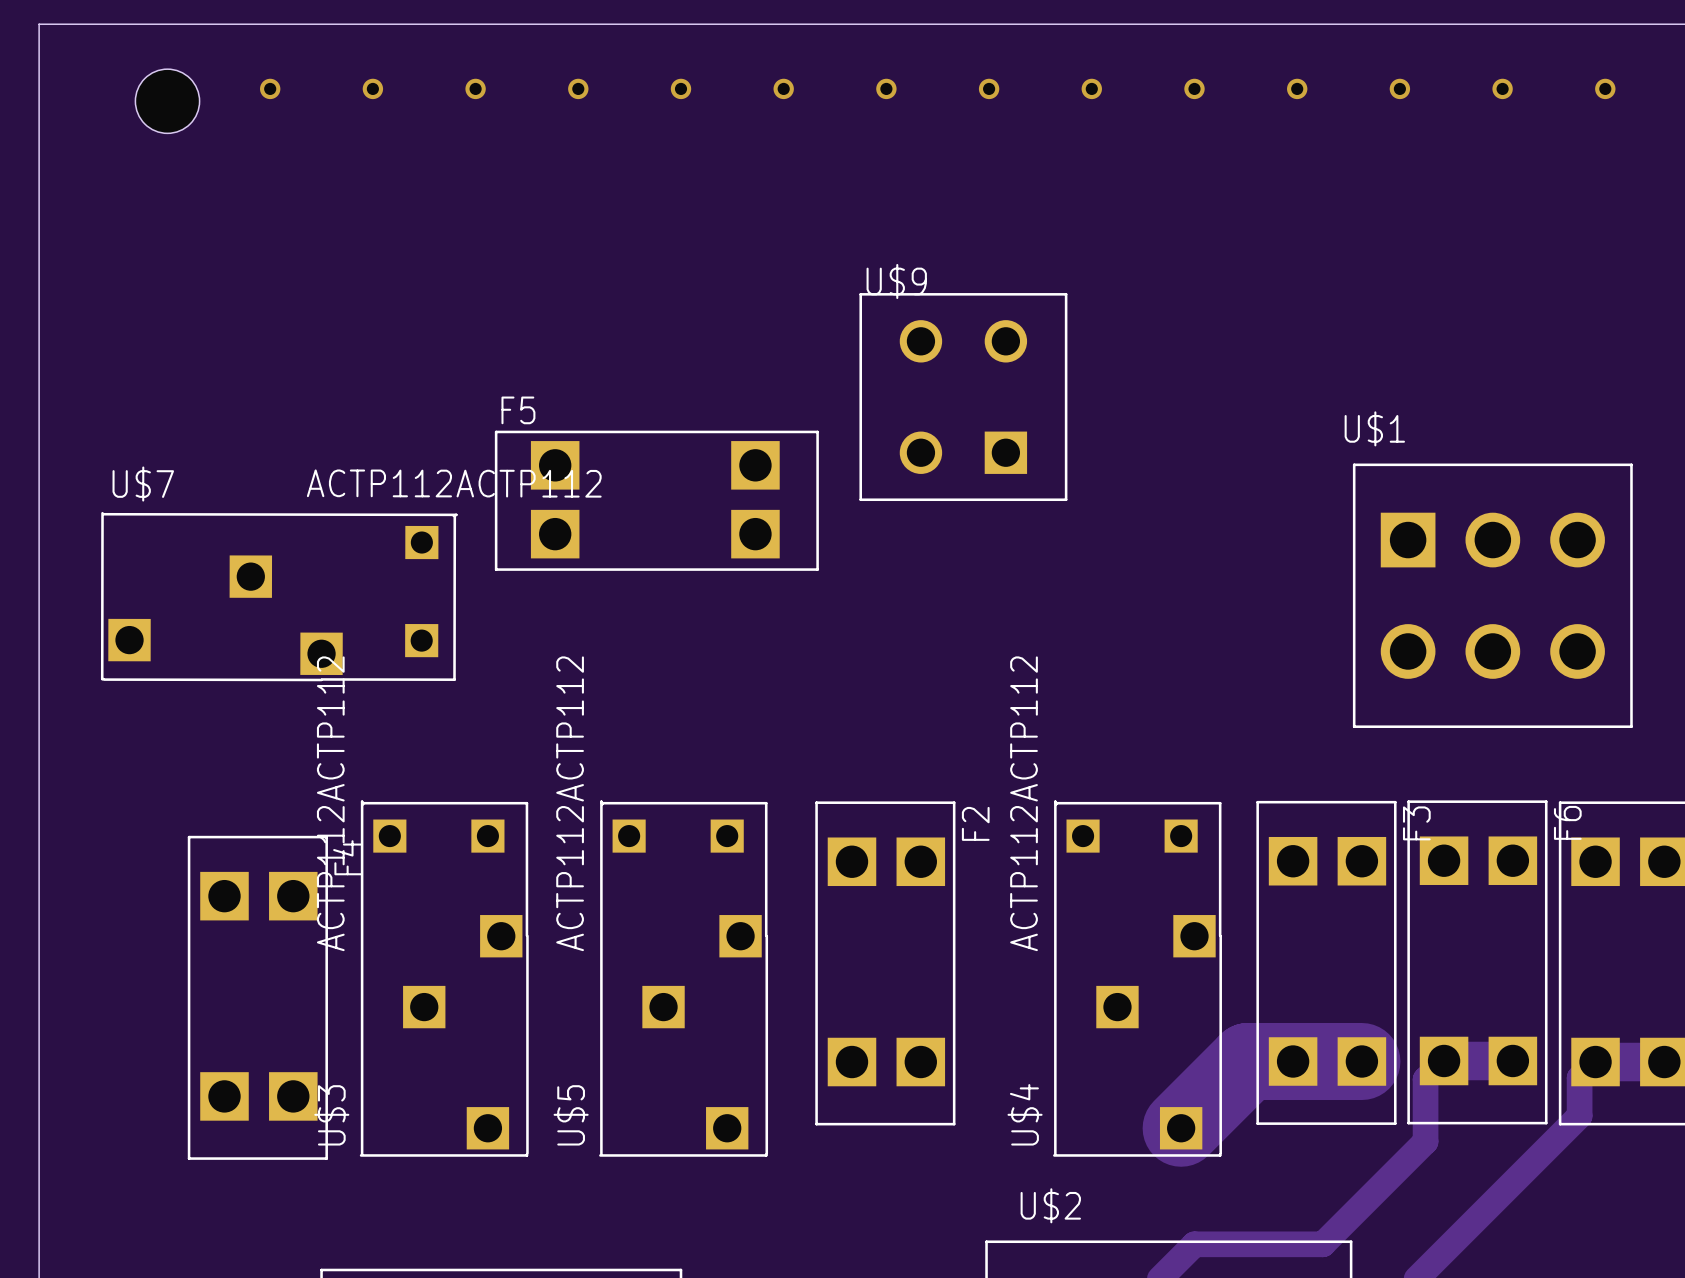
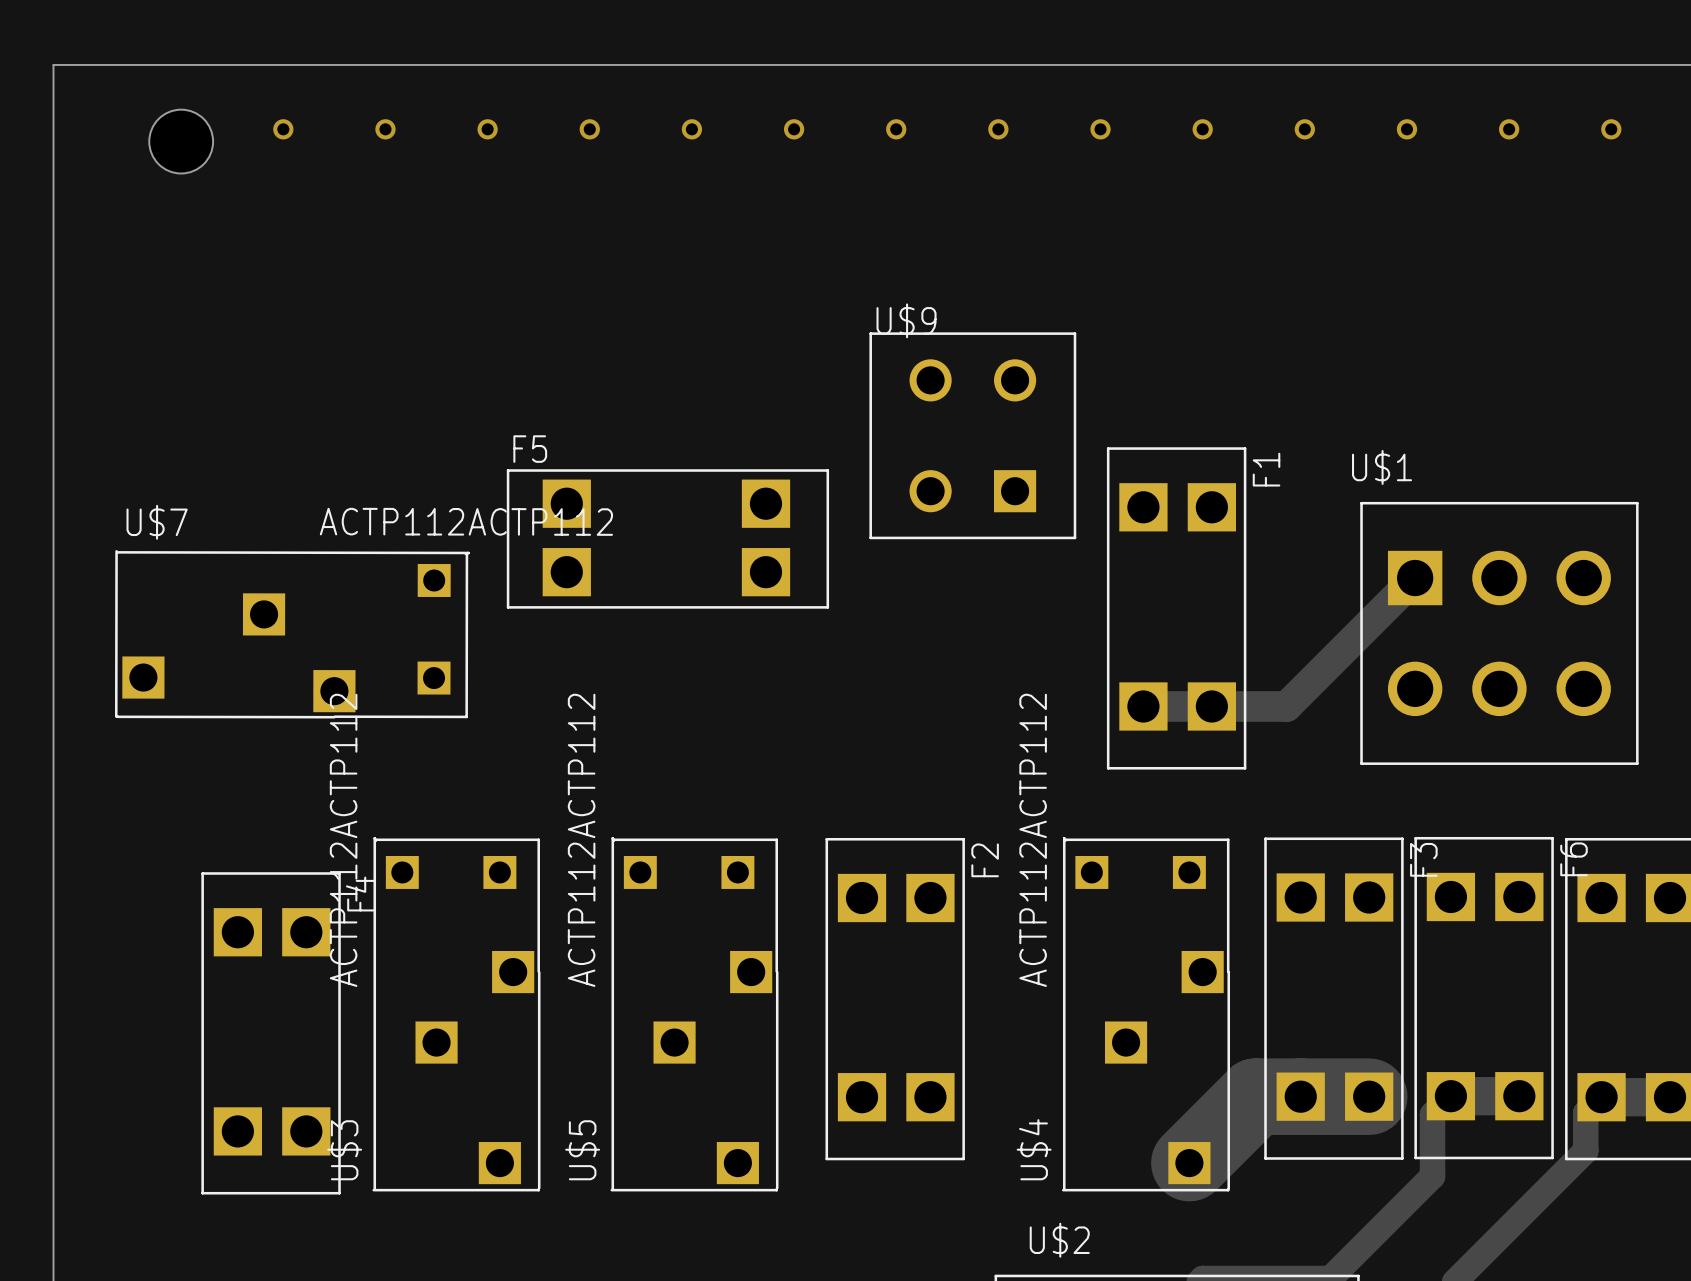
track: none -> (1415, 578) (1286, 706) (1143, 706)
F1: none -> (1176, 608)

